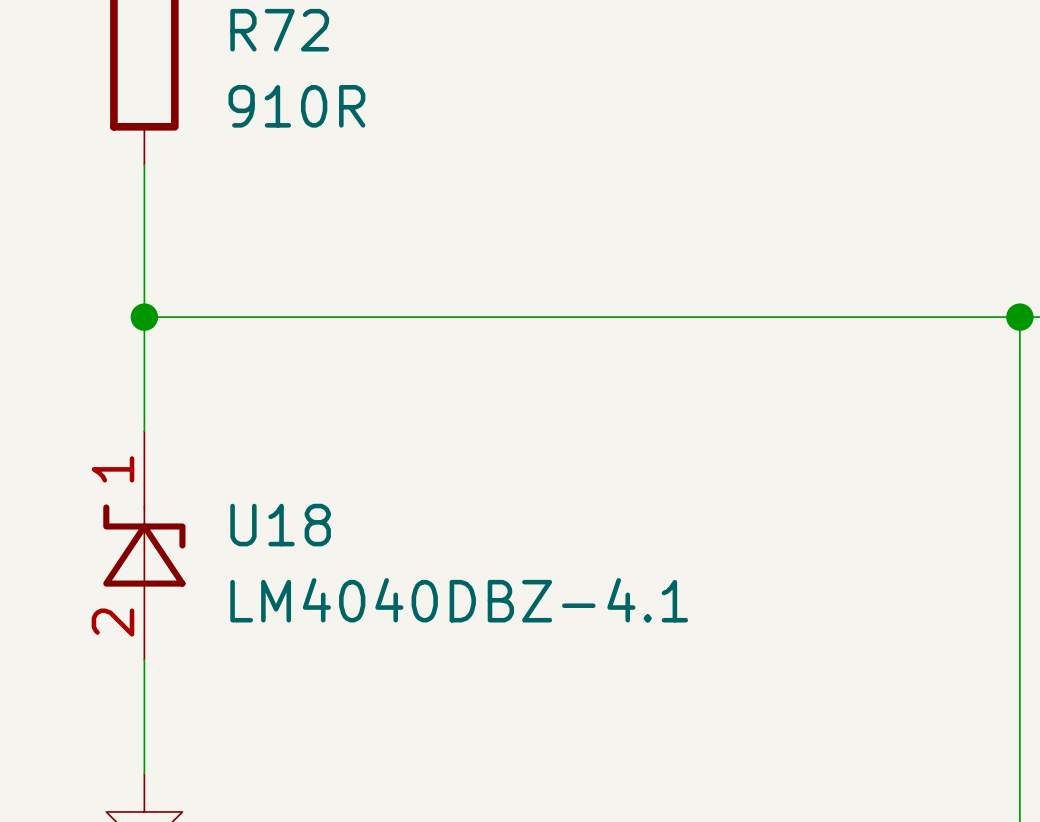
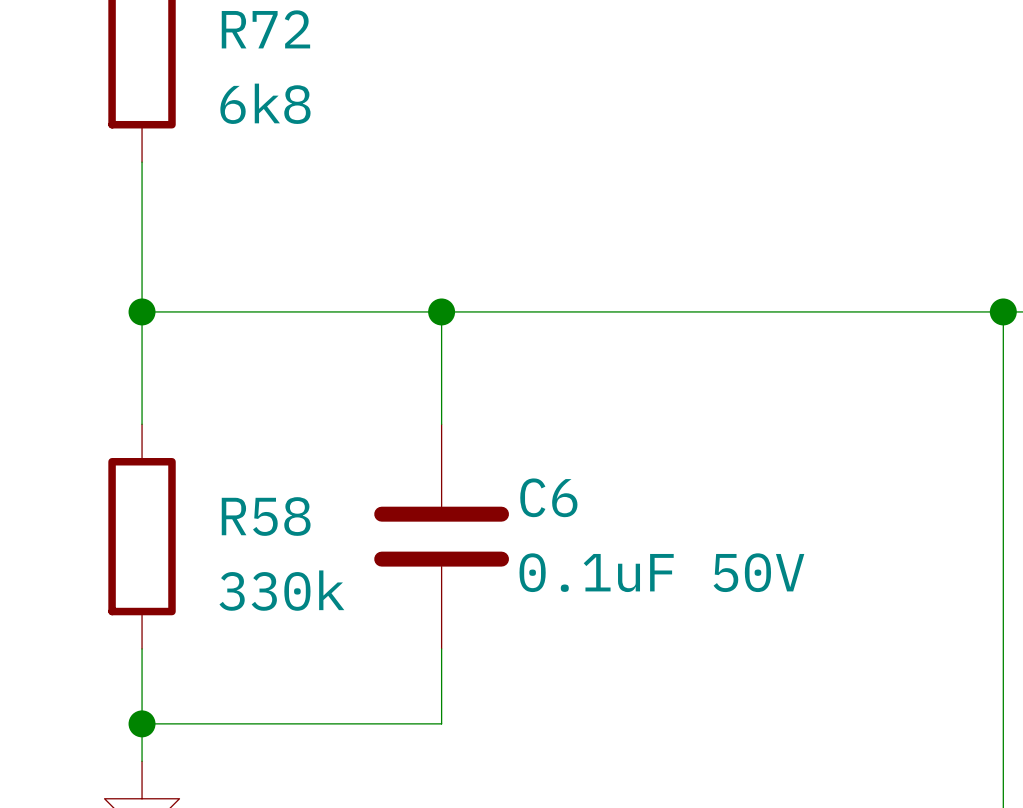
R72 value: 910R (296, 106) -> 6k8 (265, 103)
wire: none -> (441, 311) (441, 424)
junction: none -> (441, 311)
U18: LM4040DBZ-4.1 (144, 545) -> none
R58: none -> 330k (142, 536)
C6: none -> 0.1uF 50V (441, 536)
wire: none -> (441, 648) (441, 723) (142, 723)
junction: none -> (142, 723)

